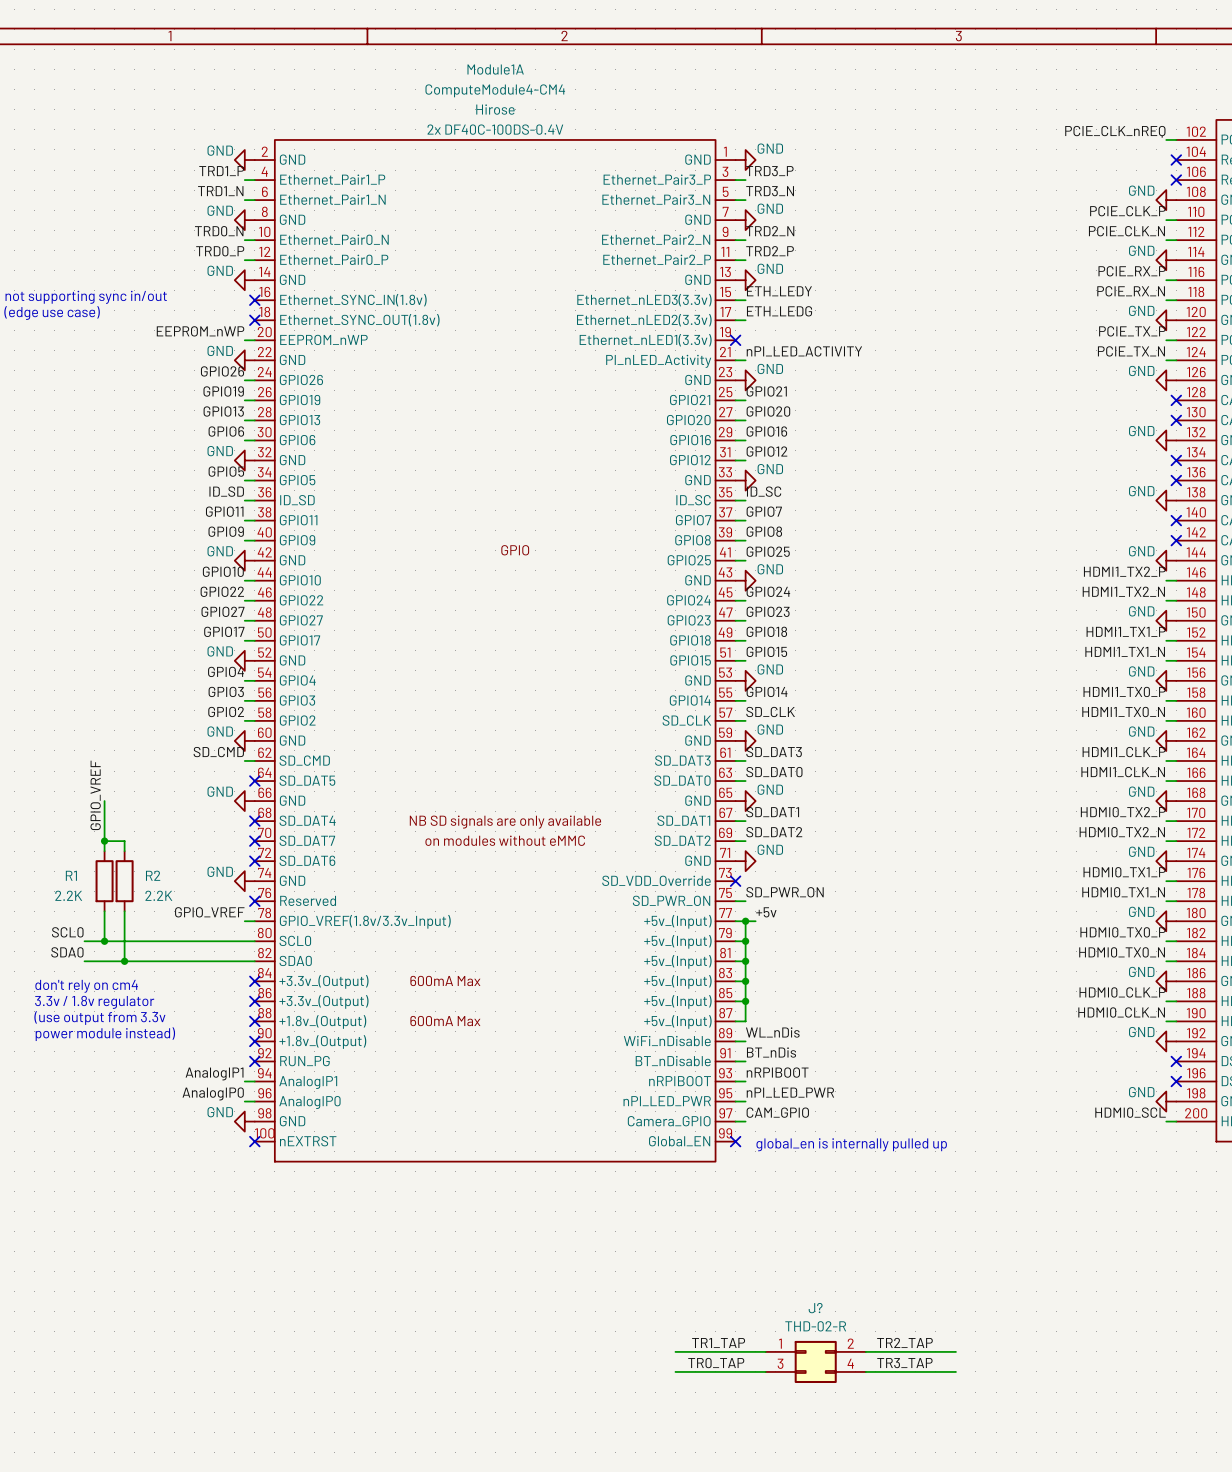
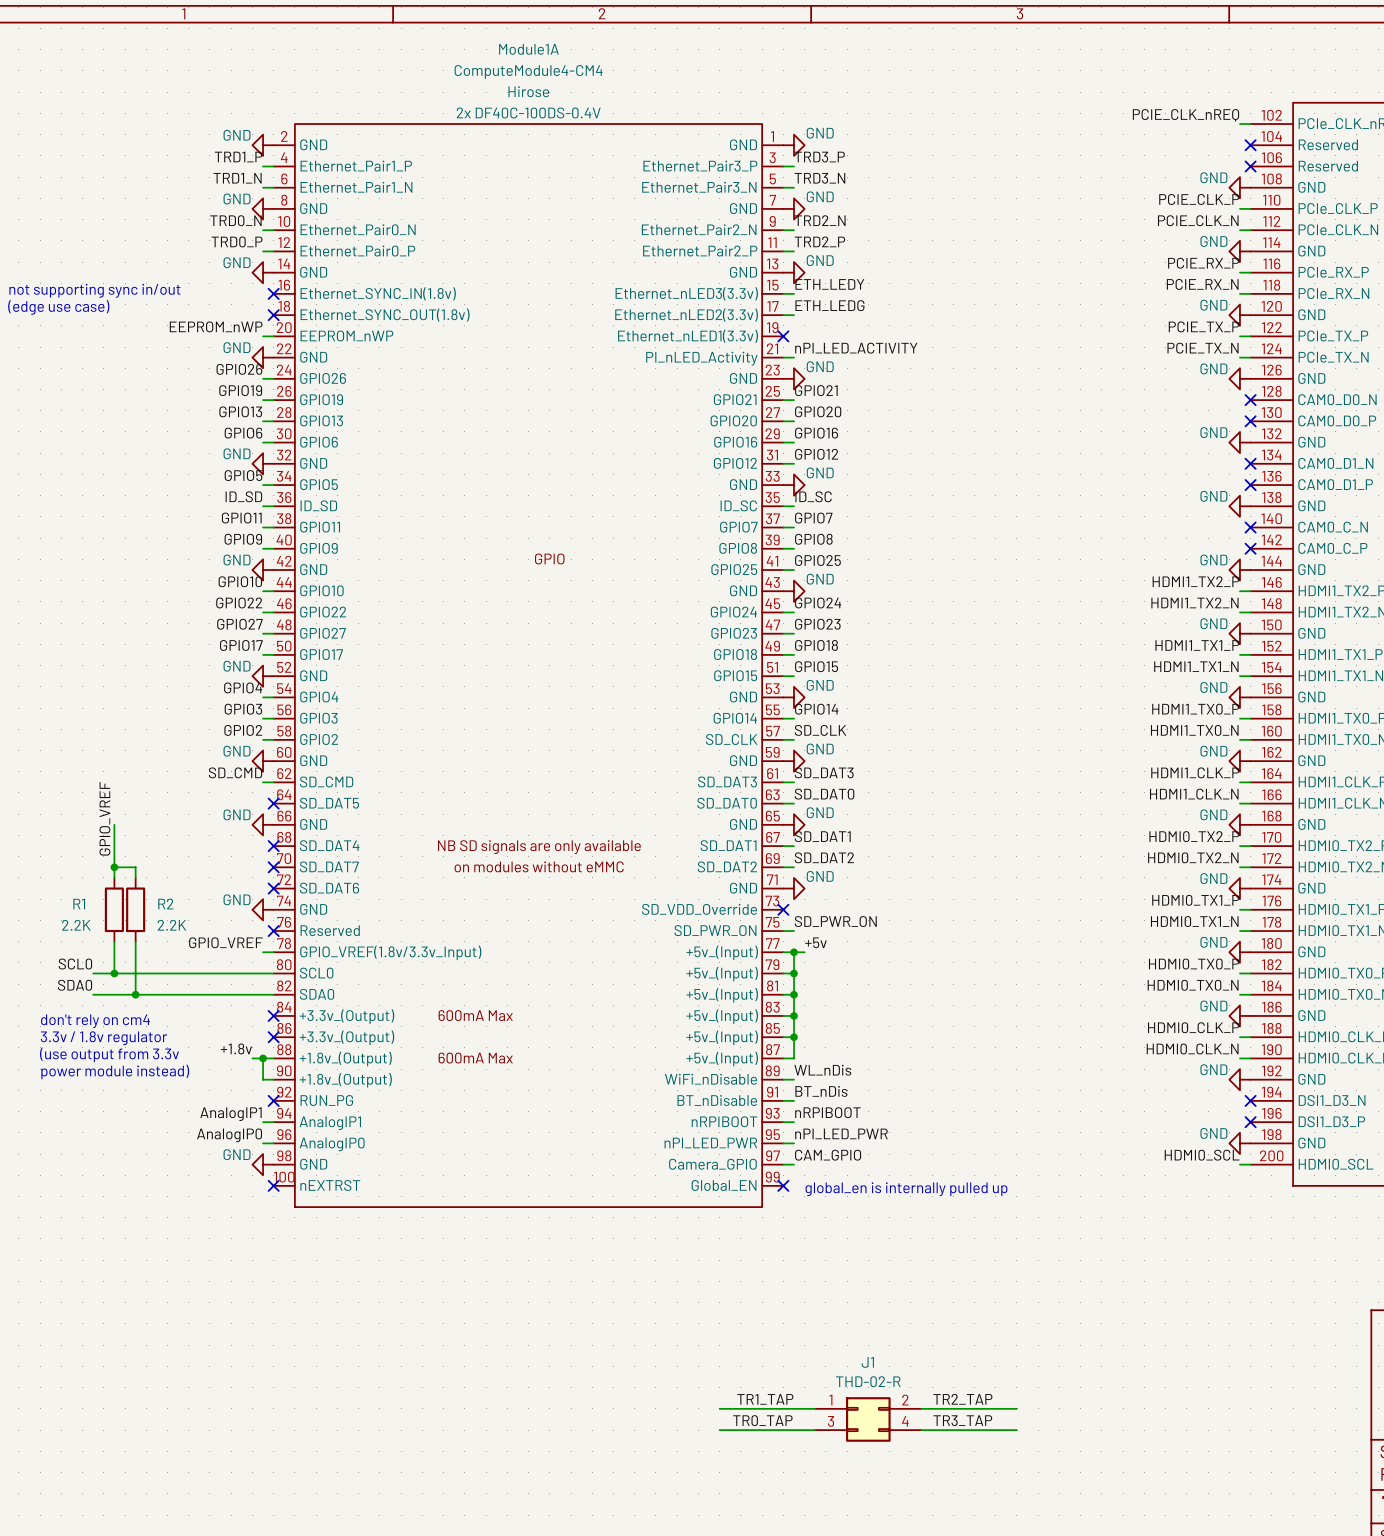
label: none -> +1.8v (236, 1048)
wire: none -> (252, 1058) (273, 1058)
wire: none -> (263, 1058) (263, 1079) (273, 1079)
junction: none -> (263, 1058)
no-connect mark: (254, 1021) -> none
no-connect mark: (254, 1041) -> none
J? name: J? (815, 1308) -> J1 (867, 1362)

